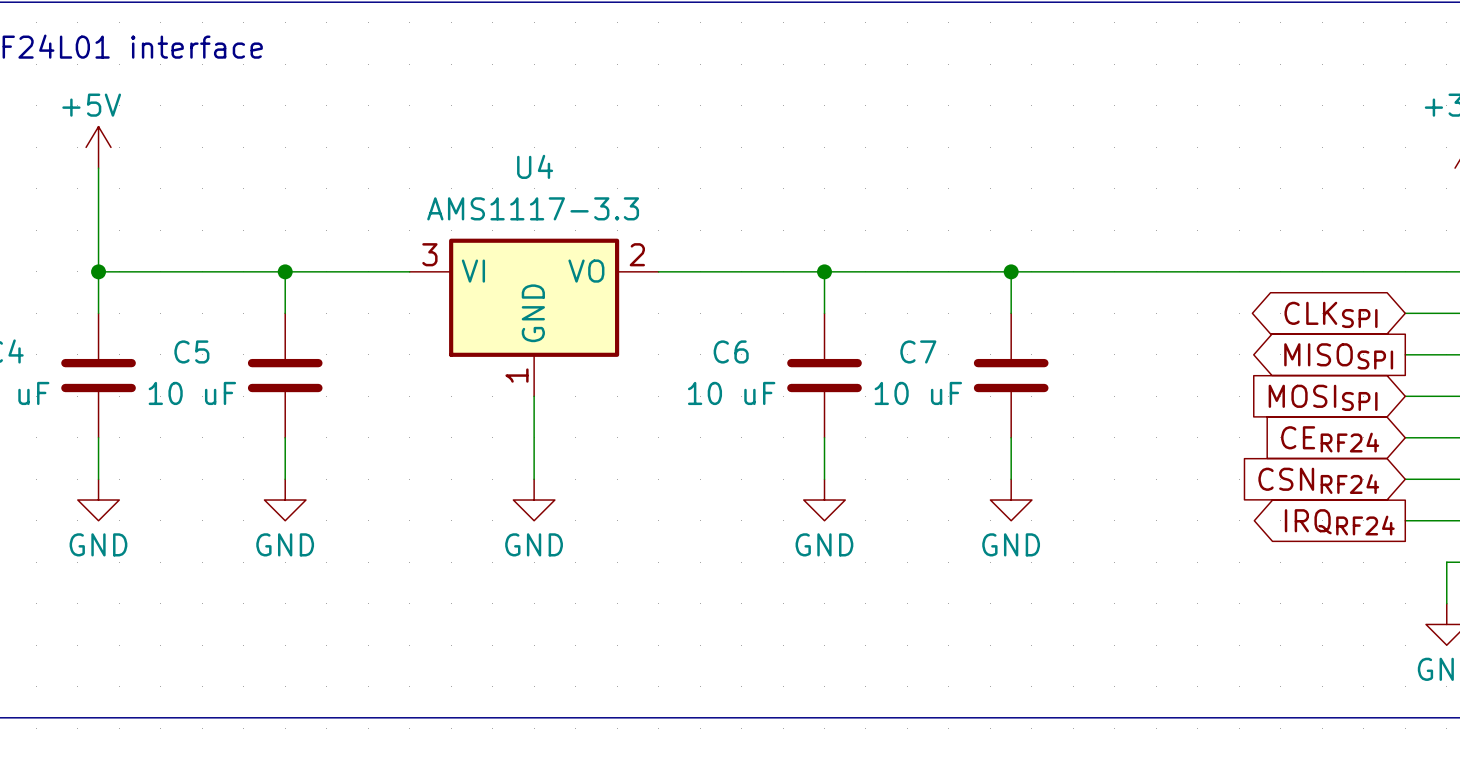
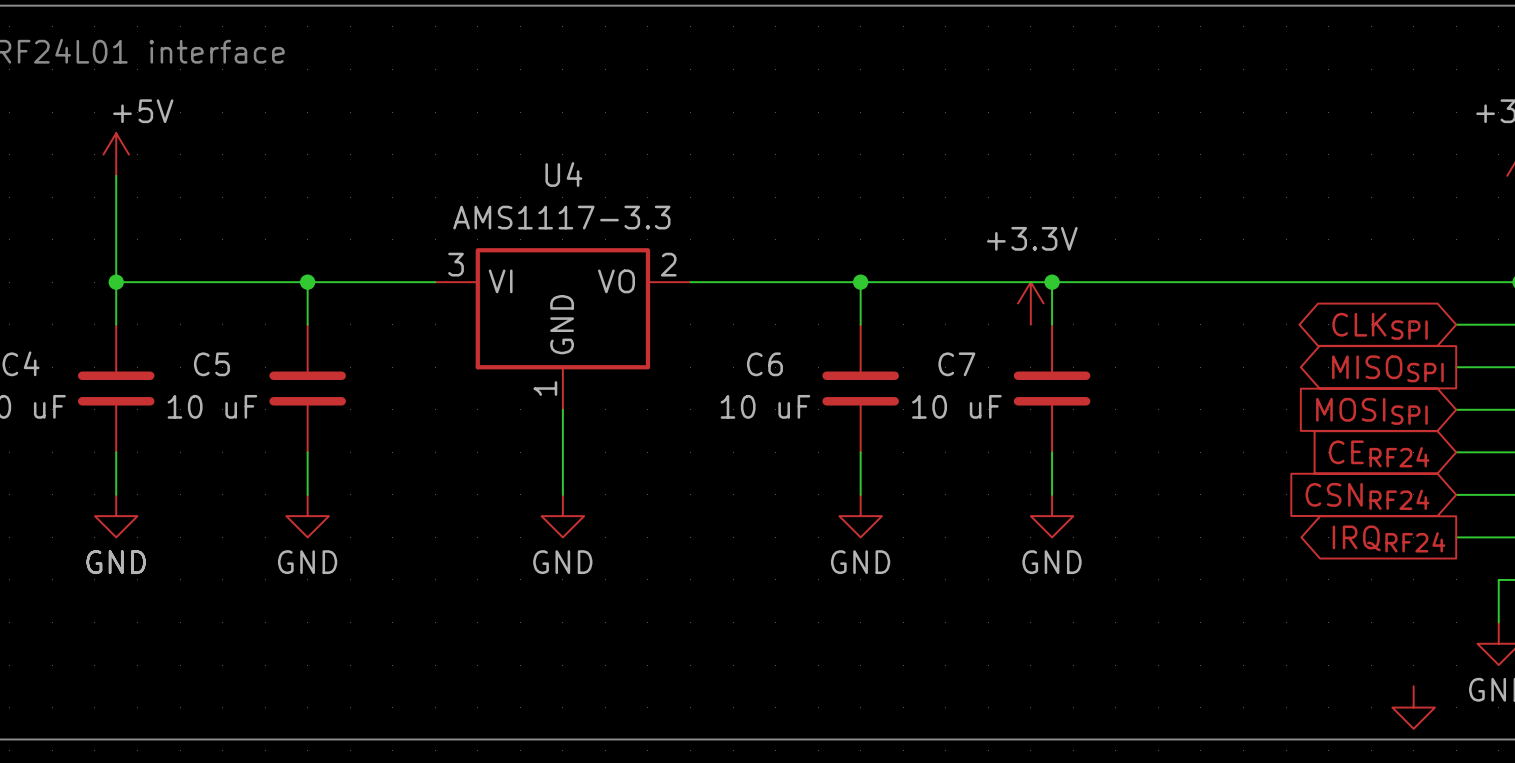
power symbol text position: +5V (91, 105) -> +5V (143, 111)
power symbol: none -> +3.3V (1030, 303)
power symbol: none -> GND (1413, 707)

